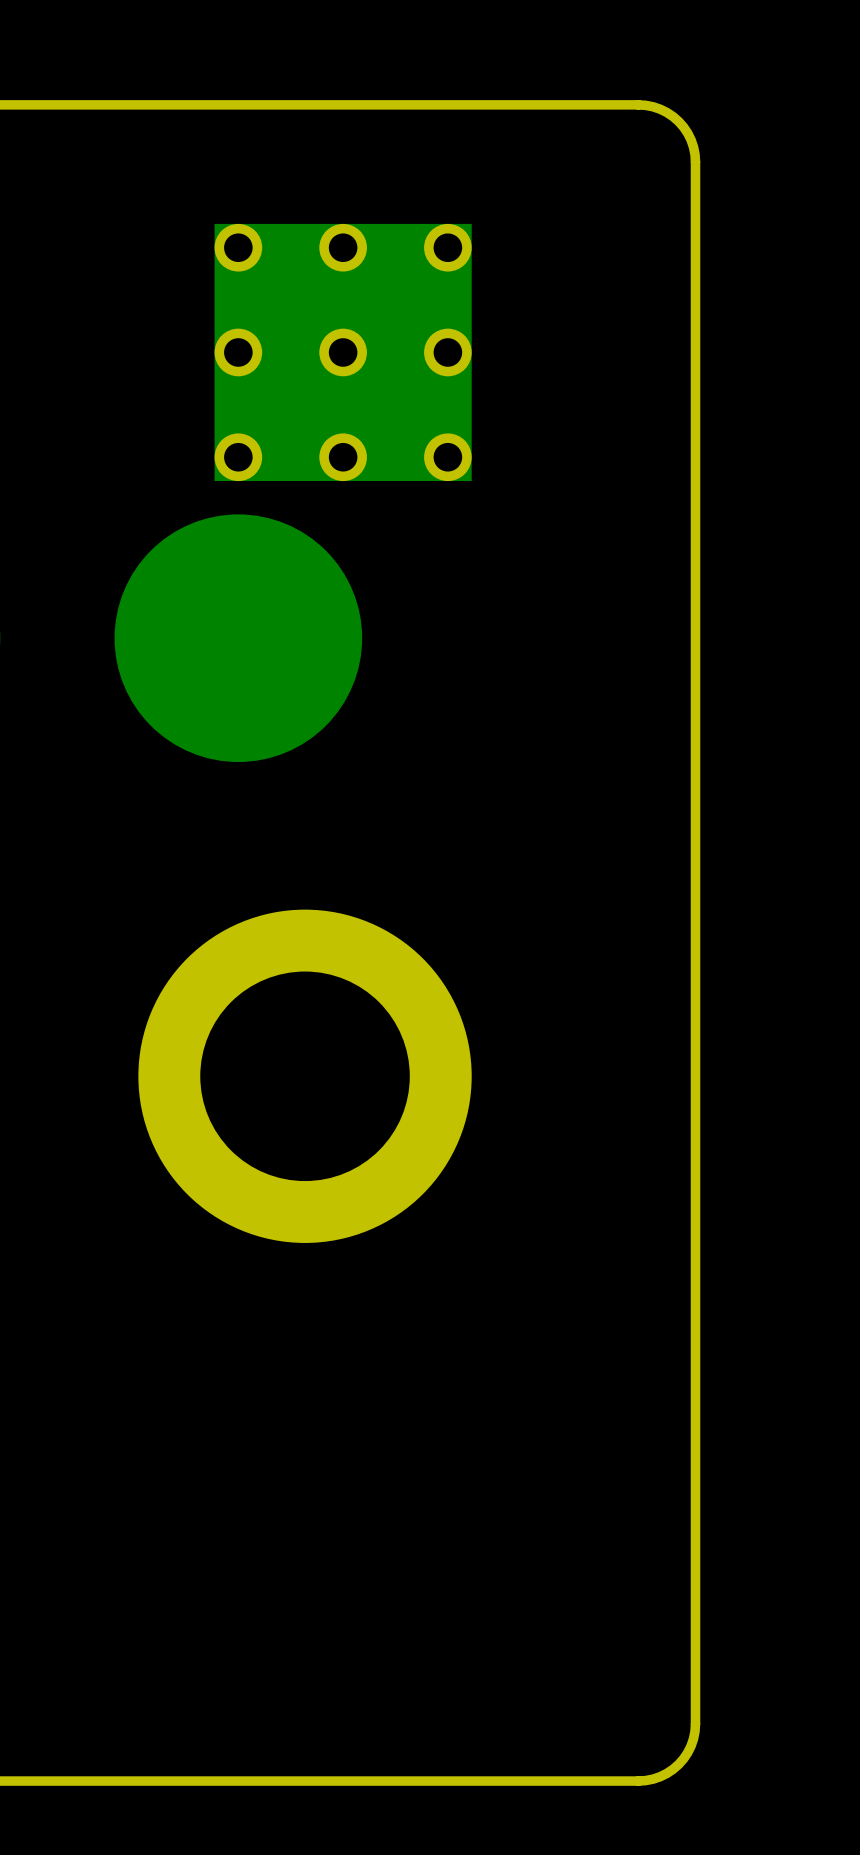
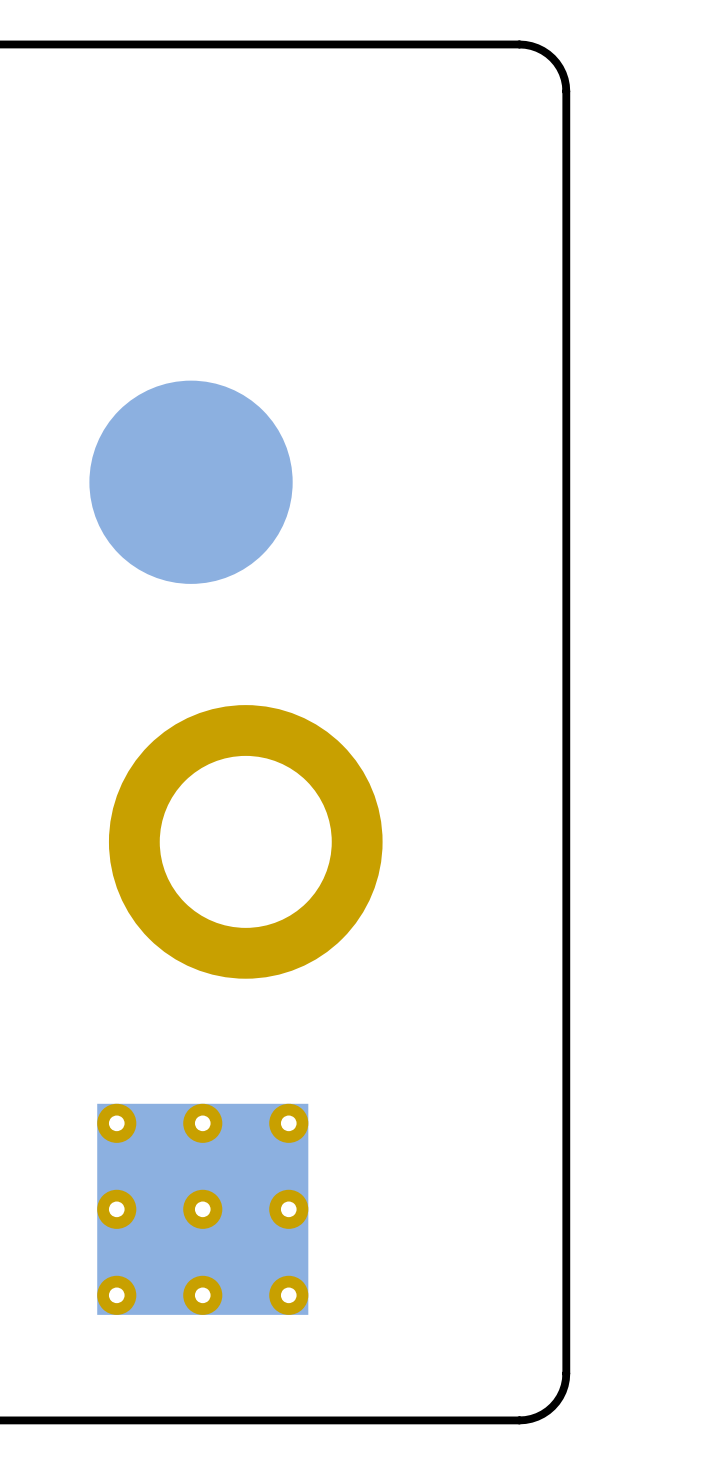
part: (343, 352) -> none
part: none -> (202, 1209)

